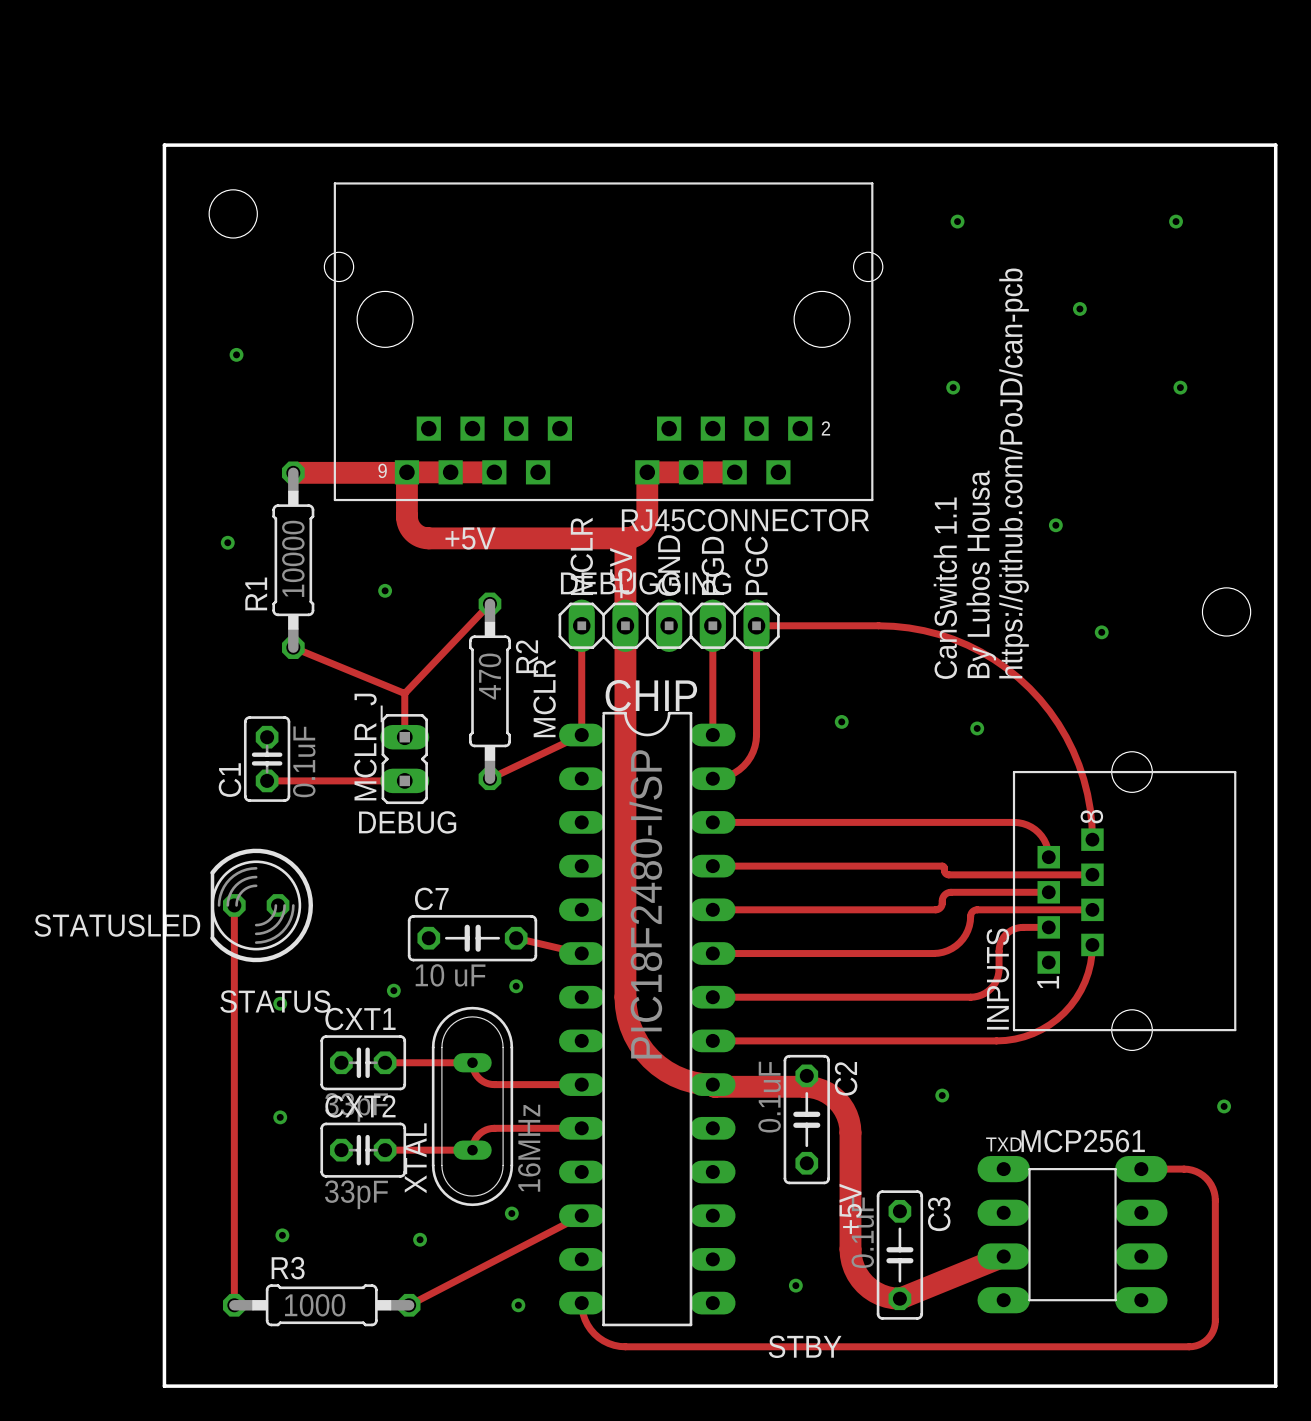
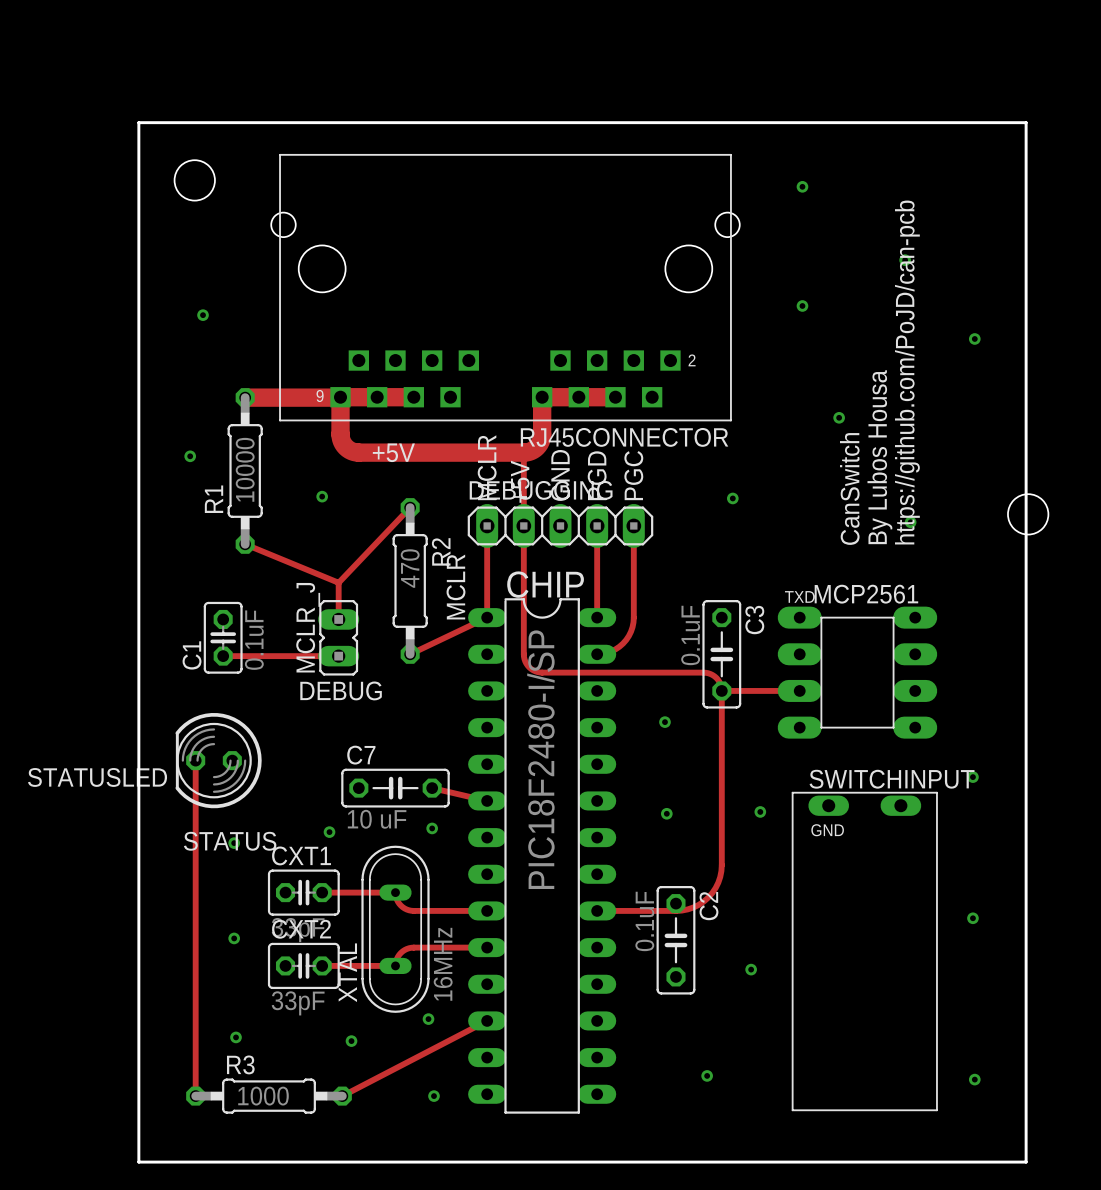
board edge: (166, 145) (164, 145) (164, 1386) (1275, 1386) (1275, 145) (1224, 145) -> (138, 122) (138, 1162) (1026, 1162) (1026, 122)
via: (1176, 221) -> none
via position: (236, 354) -> (203, 315)
via position: (953, 387) -> (802, 305)
via position: (1180, 387) -> (974, 338)
text position: https://github.com/PoJD/can-pcb (1014, 473) -> https://github.com/PoJD/can-pcb (907, 372)
via: none -> (839, 417)
via: (1055, 525) -> none
track width: thick (625, 538) (625, 778) -> thin (523, 452) (523, 654)
text position: By Lubos Housa (981, 574) -> By Lubos Housa (879, 457)
text: none -> CanSwitch (849, 488)
text: CanSwitch 1.1 (945, 588) -> none
via: none -> (732, 498)
track: (756, 625) (878, 625) (909, 627) (953, 639) (994, 659) (1029, 688) (1049, 711) (1066, 737) (1083, 779) (1090, 809) (1092, 839) -> none
via position: (1101, 632) -> (910, 522)
via: (841, 721) -> none
via: (977, 728) -> none
track: (625, 778) (625, 997) (630, 1026) (638, 1043) (651, 1059) (666, 1071) (693, 1082) (712, 1084) (715, 1086) (804, 1086) -> (523, 654) (529, 667) (539, 672) (705, 672) (716, 677) (721, 686) (721, 865) (720, 876) (715, 888) (708, 897) (698, 904) (681, 910) (597, 910)
track: (712, 822) (861, 822) -> none
track: (954, 822) (1013, 822) (1027, 825) (1038, 832) (1044, 839) (1048, 857) -> none
via: none -> (664, 722)
track: (712, 866) (942, 866) (945, 873) (948, 874) (1092, 874) -> none
track: (1048, 892) (949, 892) (943, 896) (940, 907) (935, 909) (712, 909) -> none
INPUTS: (1124, 901) -> none
track: (1092, 909) (975, 910) (971, 913) (969, 925) (962, 938) (952, 948) (938, 953) (712, 953) -> none
via: none -> (972, 777)
track: (1048, 927) (1019, 927) (1006, 934) (999, 945) (996, 979) (990, 988) (978, 996) (712, 997) -> none
track: (1092, 944) (1088, 972) (1081, 990) (1070, 1005) (1049, 1024) (1024, 1036) (996, 1040) (712, 1040) -> none
via: none -> (760, 811)
via: none -> (666, 813)
track: (804, 1086) (822, 1090) (832, 1096) (841, 1104) (848, 1120) (850, 1255) (857, 1274) (869, 1288) (887, 1297) (899, 1298) (1003, 1256) -> none
via: (942, 1095) -> none
via position: (1224, 1106) -> (972, 918)
SWITCHINPUT: none -> (864, 951)
via: none -> (751, 969)
track: (1141, 1169) (1192, 1170) (1206, 1178) (1214, 1192) (1215, 1324) (1207, 1339) (1195, 1345) (619, 1346) (608, 1343) (594, 1333) (585, 1319) (581, 1303) -> none
text: +5V (850, 1208) -> none
MCP2561 position: (1072, 1234) -> (857, 672)
C3 position: (899, 1255) -> (721, 654)
via position: (795, 1285) -> (707, 1075)
via: none -> (974, 1079)
text: STBY (805, 1346) -> none

